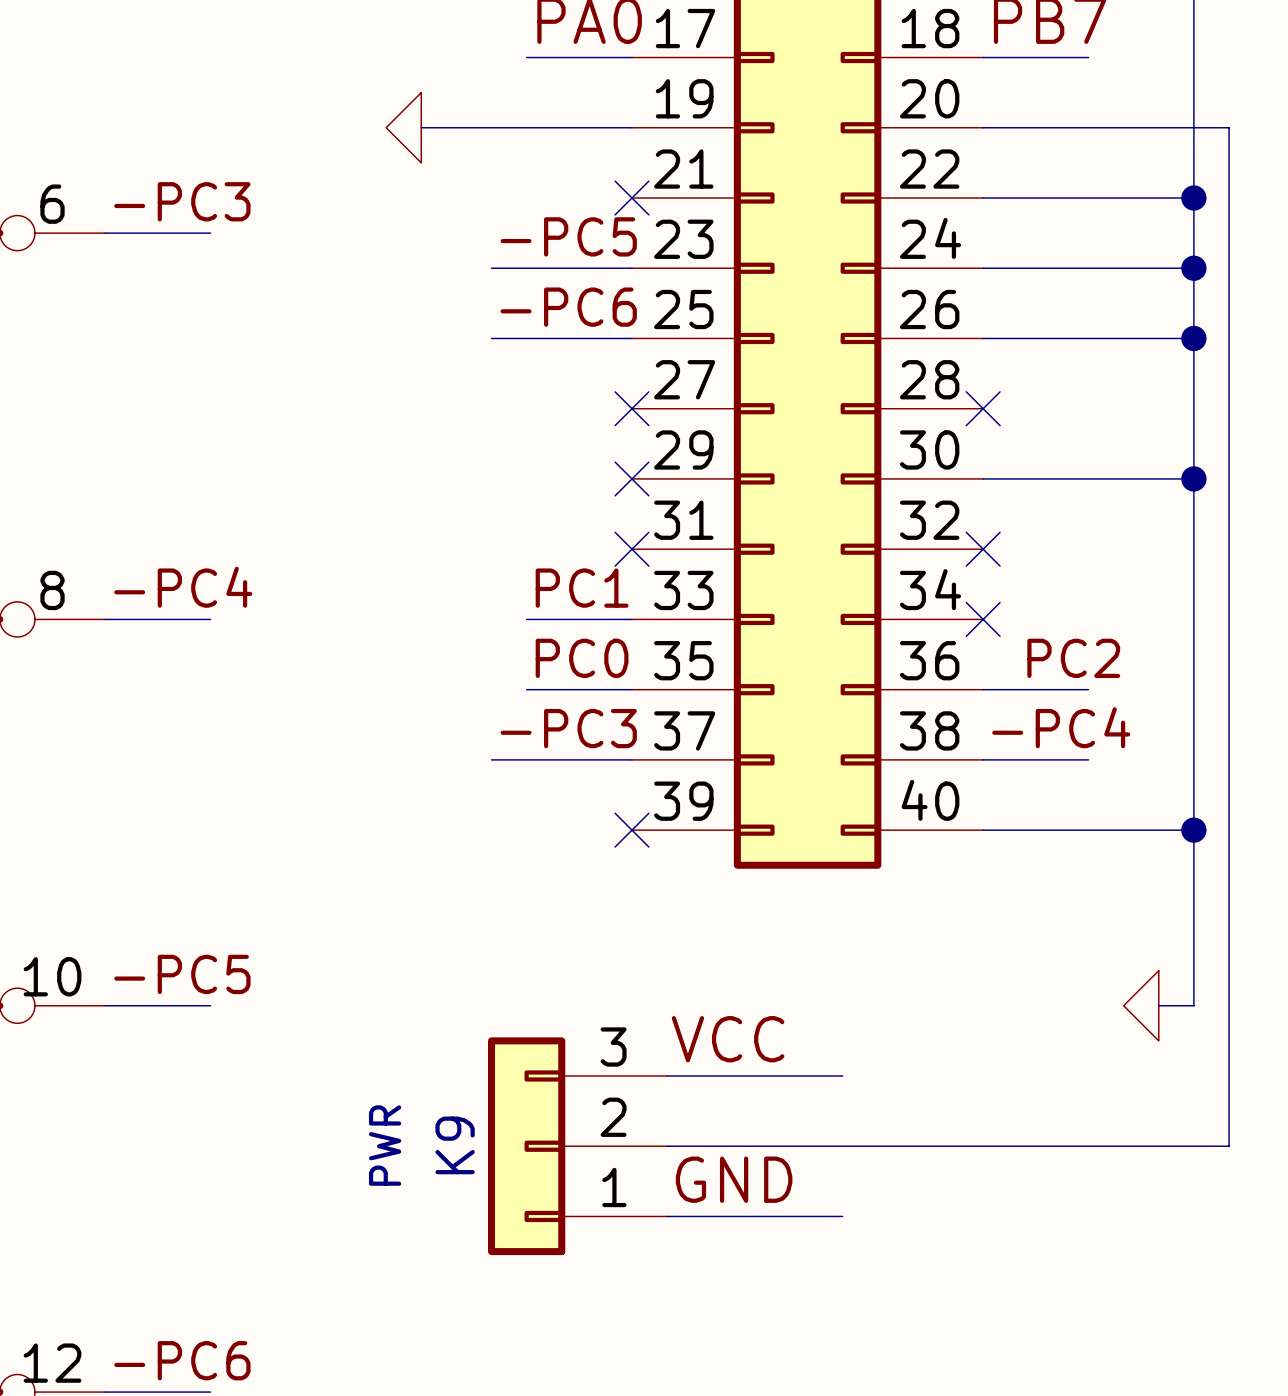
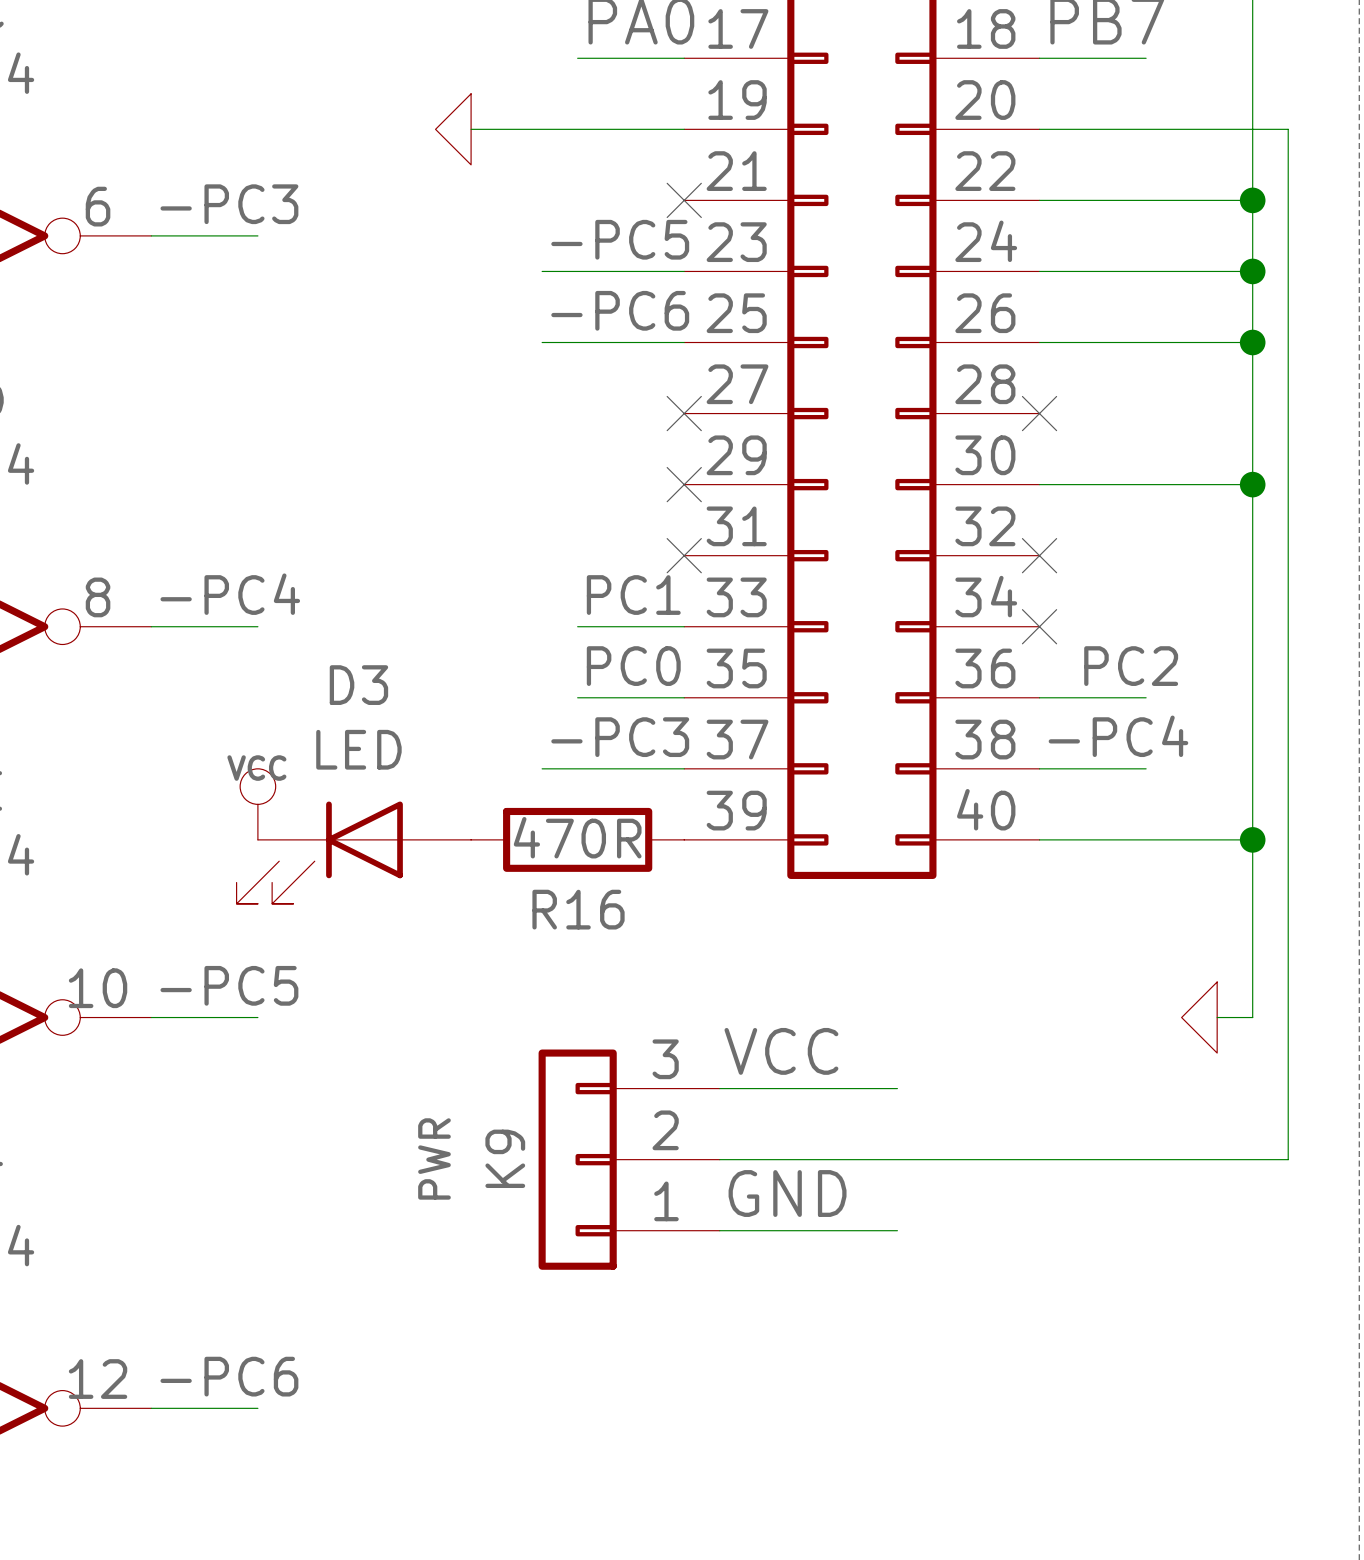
power symbol: none -> VCC (257, 804)
R16: none -> 470R (577, 839)
no-connect mark: (631, 830) -> none
D3: none -> LED (353, 852)

